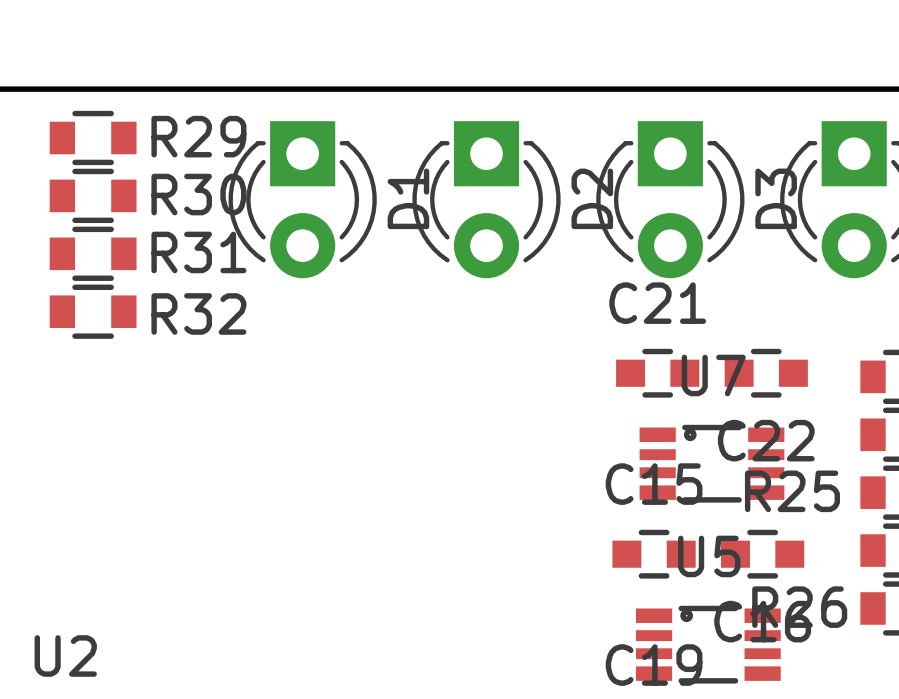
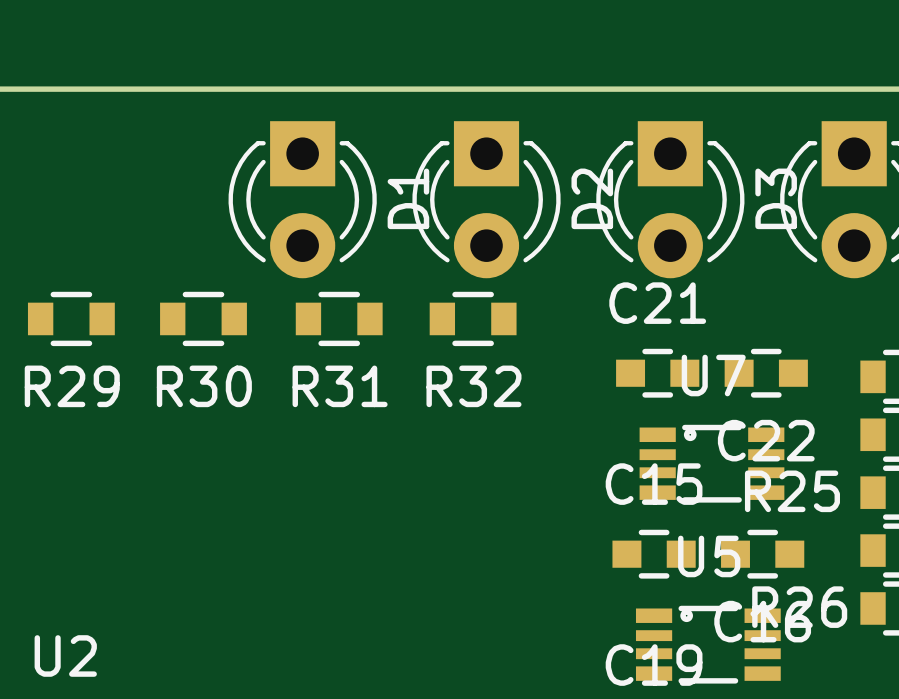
R29 name position: R29 (198, 136) -> R29 (72, 386)
R29 position: (93, 137) -> (71, 318)
R30 name position: R30 (198, 194) -> R30 (204, 386)
R30 position: (93, 195) -> (203, 318)
R31 name position: R31 (198, 252) -> R31 (340, 386)
R31 position: (93, 253) -> (339, 318)
R32 position: (93, 311) -> (473, 318)
R32 name position: R32 (198, 313) -> R32 (473, 386)

